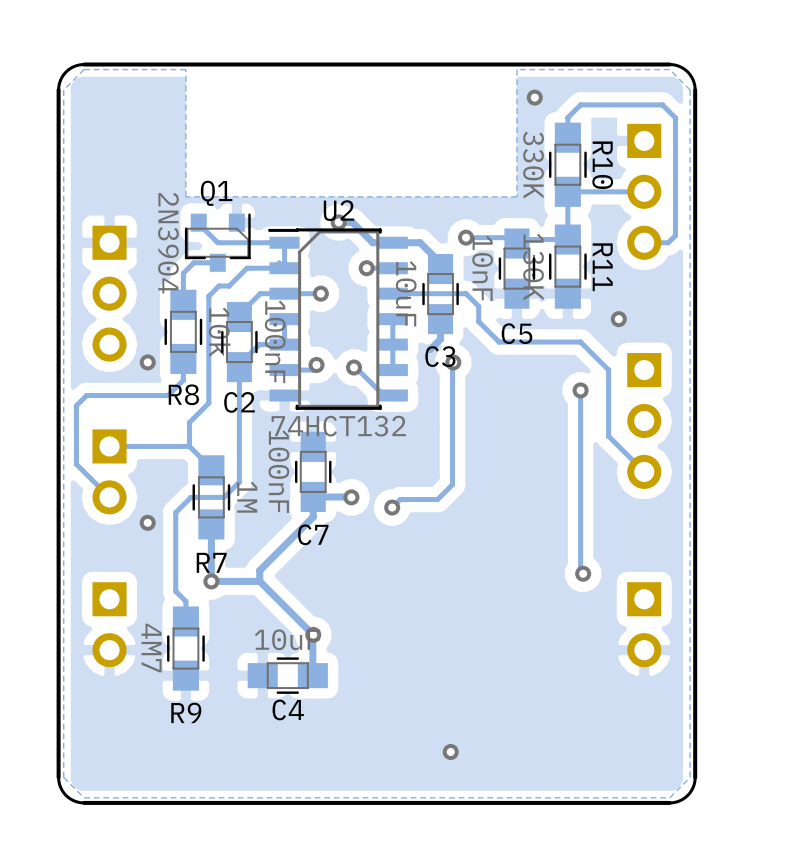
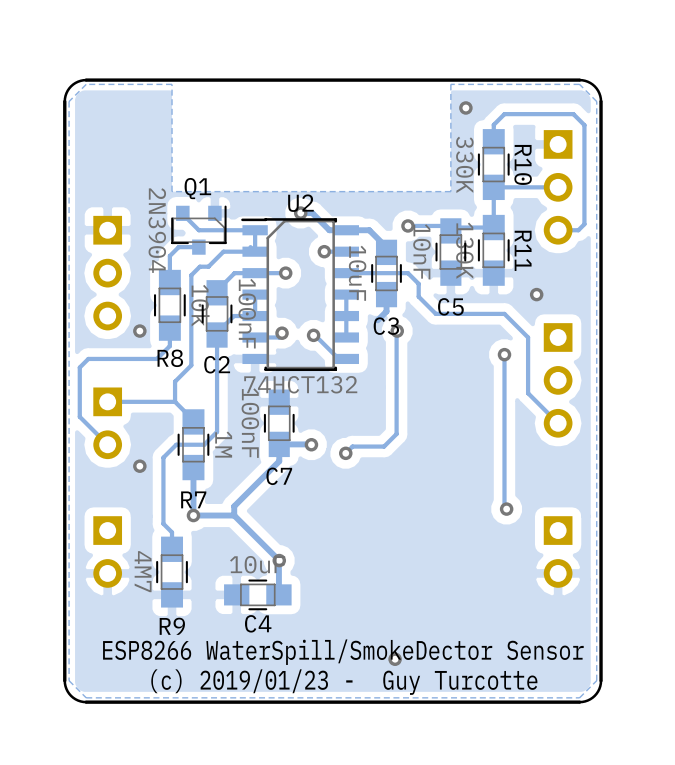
text: none -> ESP8266 WaterSpill/SmokeDector Sensor (343, 652)
text: none -> (c) 2019/01/23 - Guy Turcotte (344, 682)

